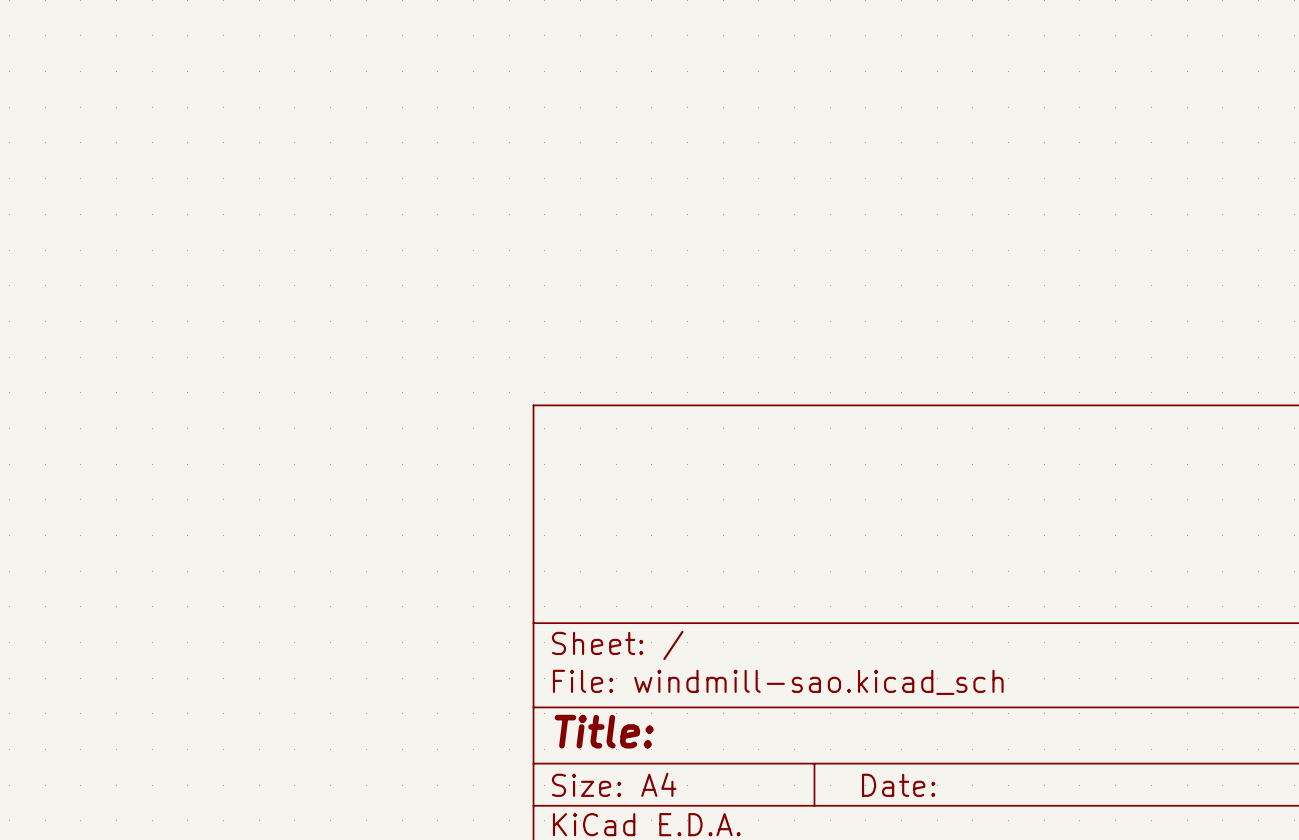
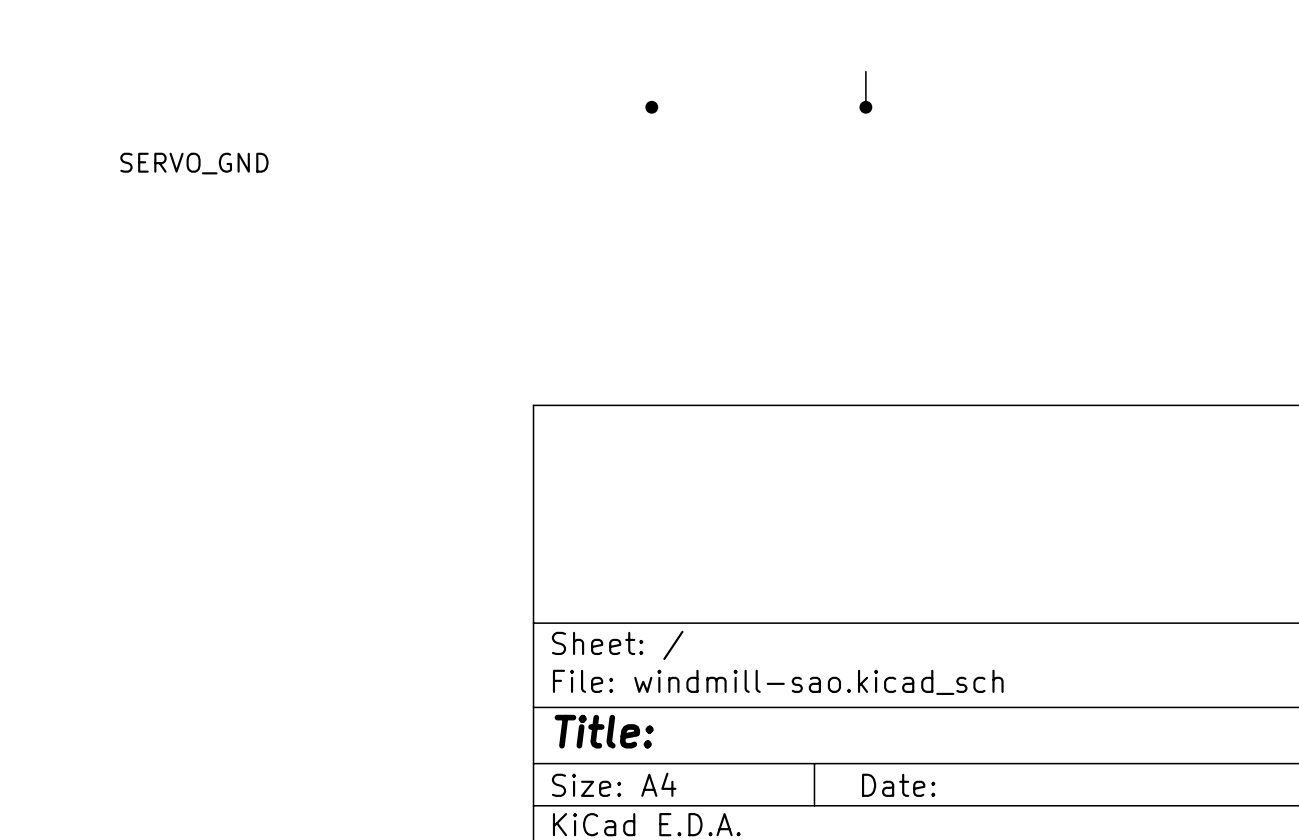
wire: none -> (865, 71) (865, 107)
junction: none -> (651, 107)
junction: none -> (865, 107)
label: none -> SERVO_GND (194, 163)

